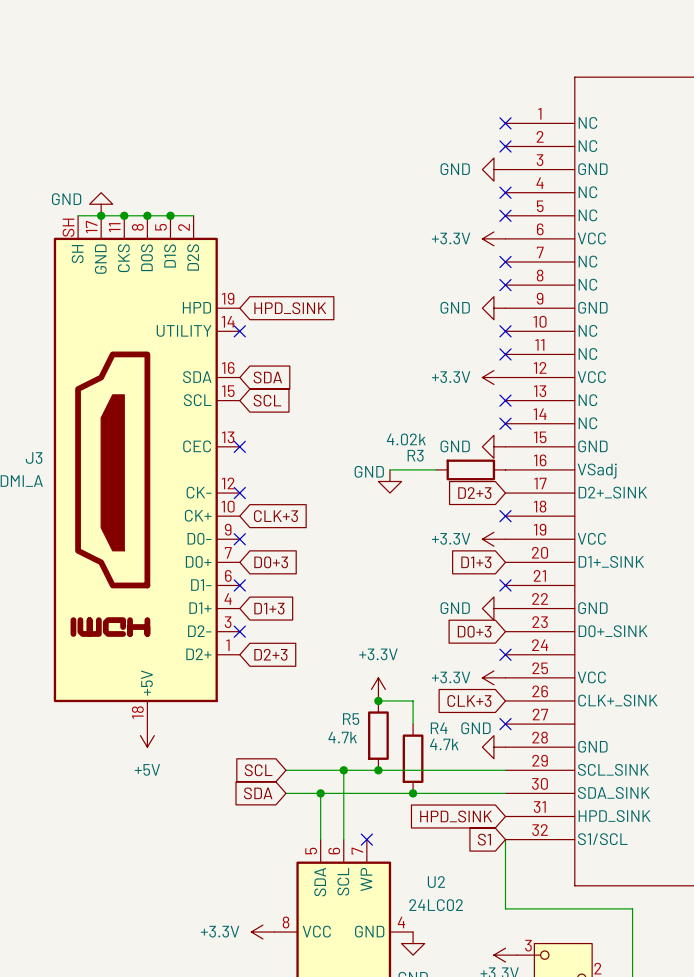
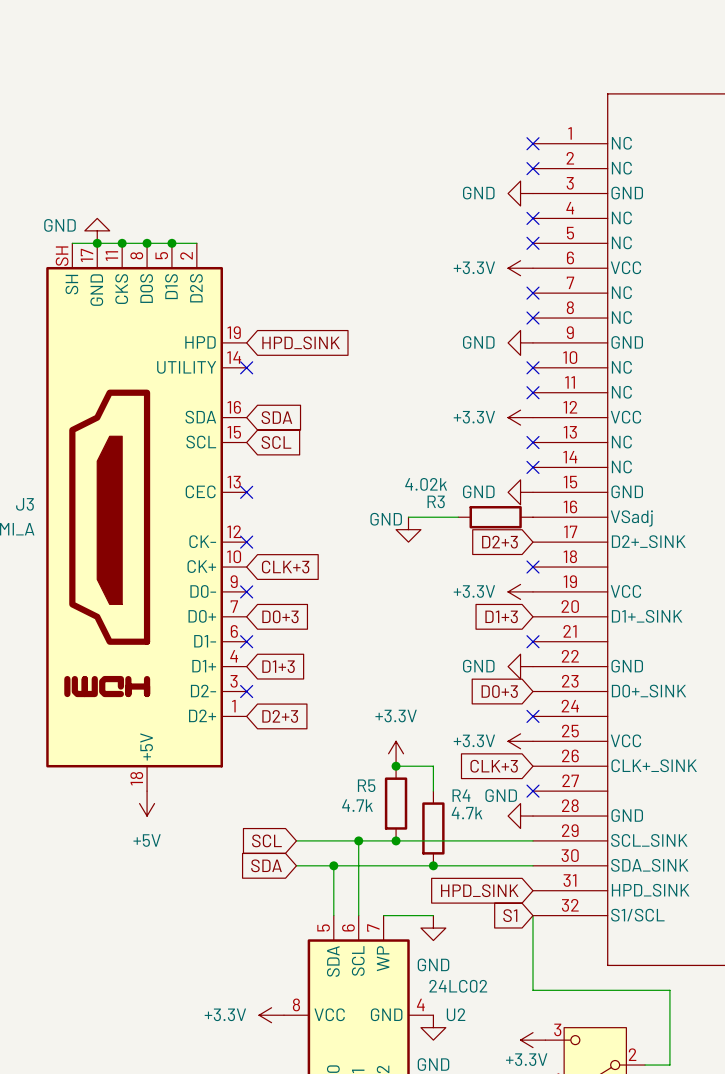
wire: none -> (383, 915) (433, 915)
no-connect mark: (366, 839) -> none
power symbol: none -> GND (433, 928)
U2 name position: U2 (436, 882) -> U2 (456, 1014)

